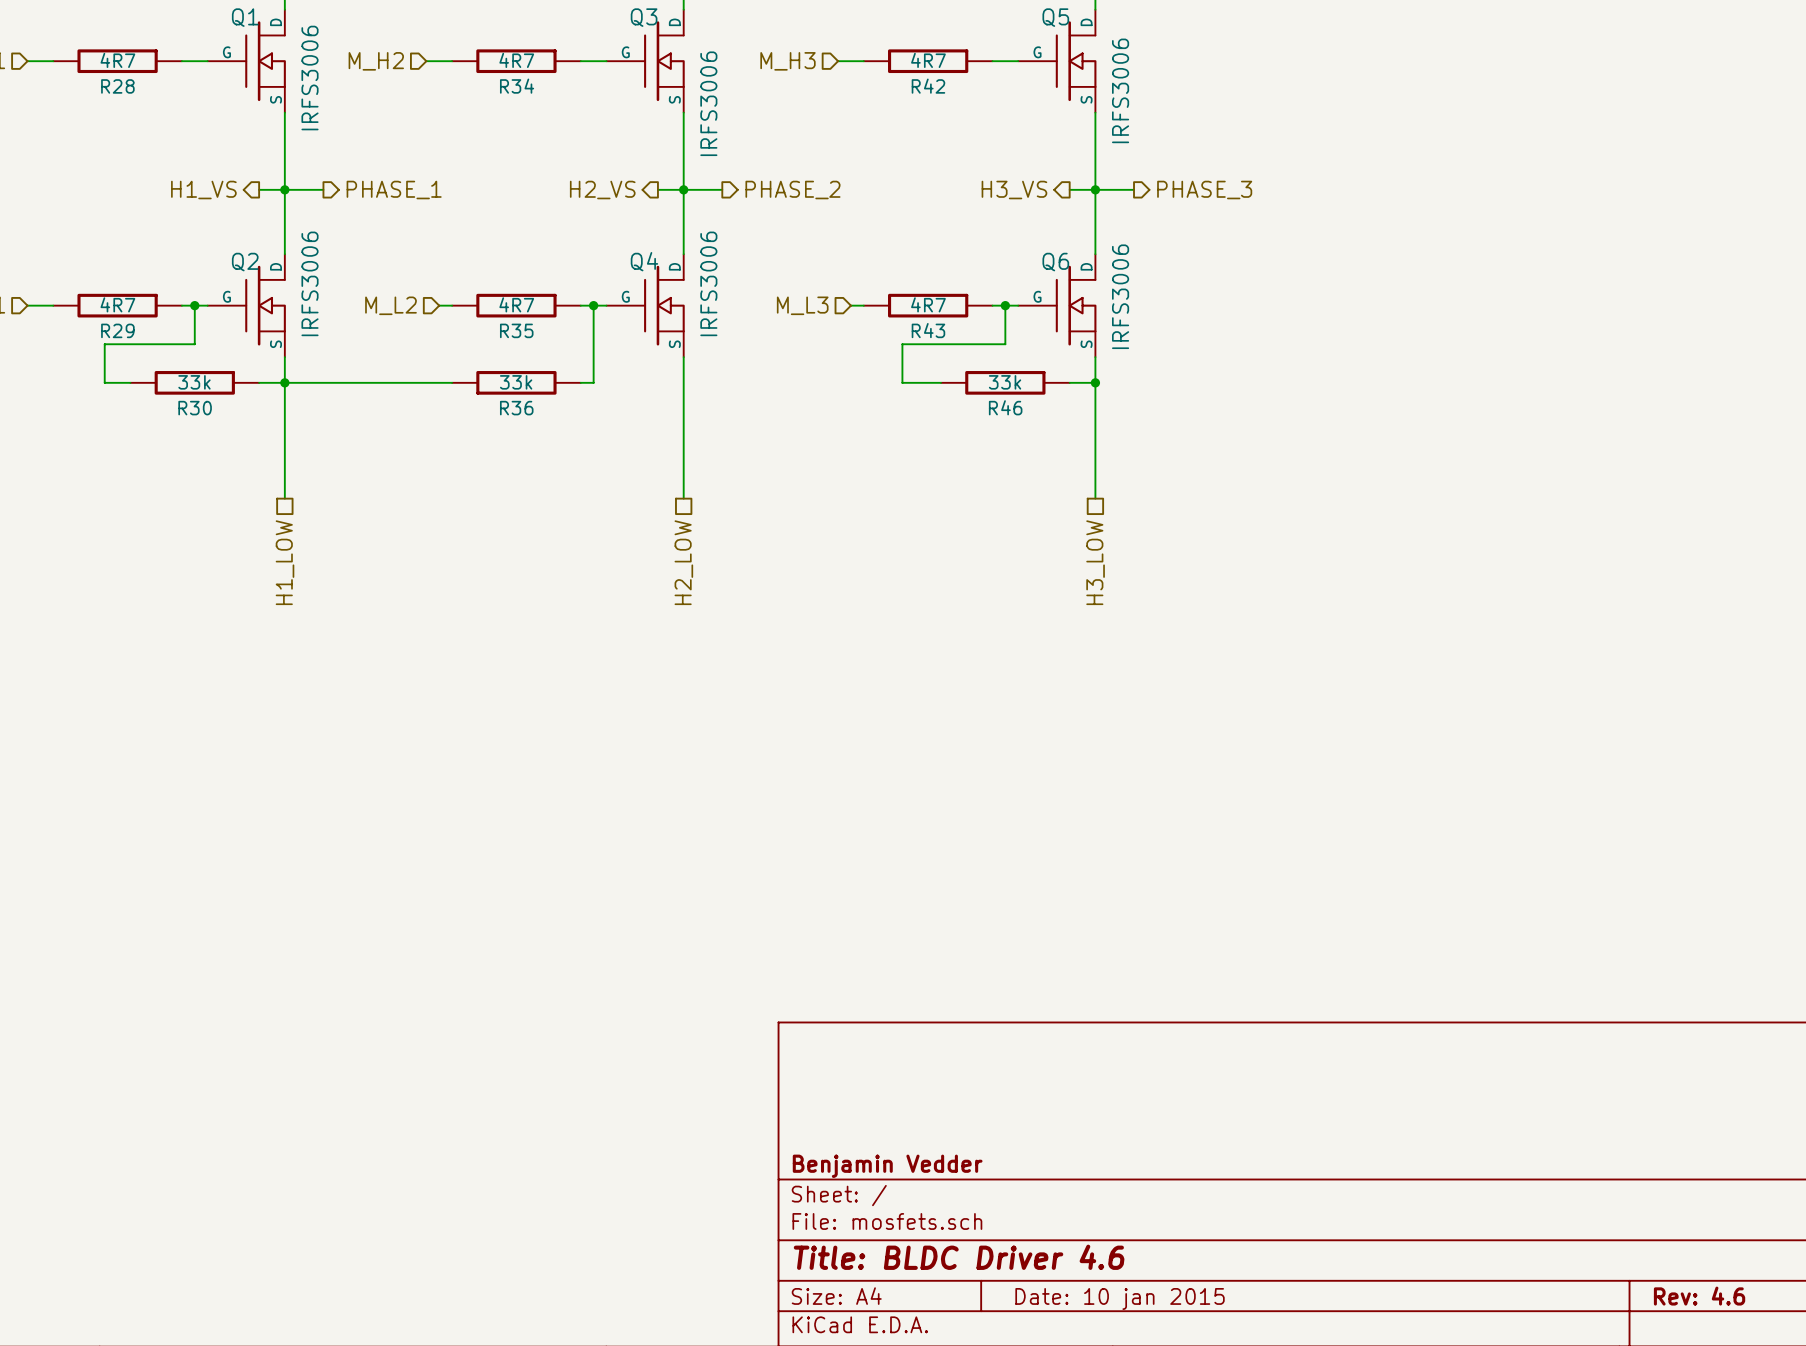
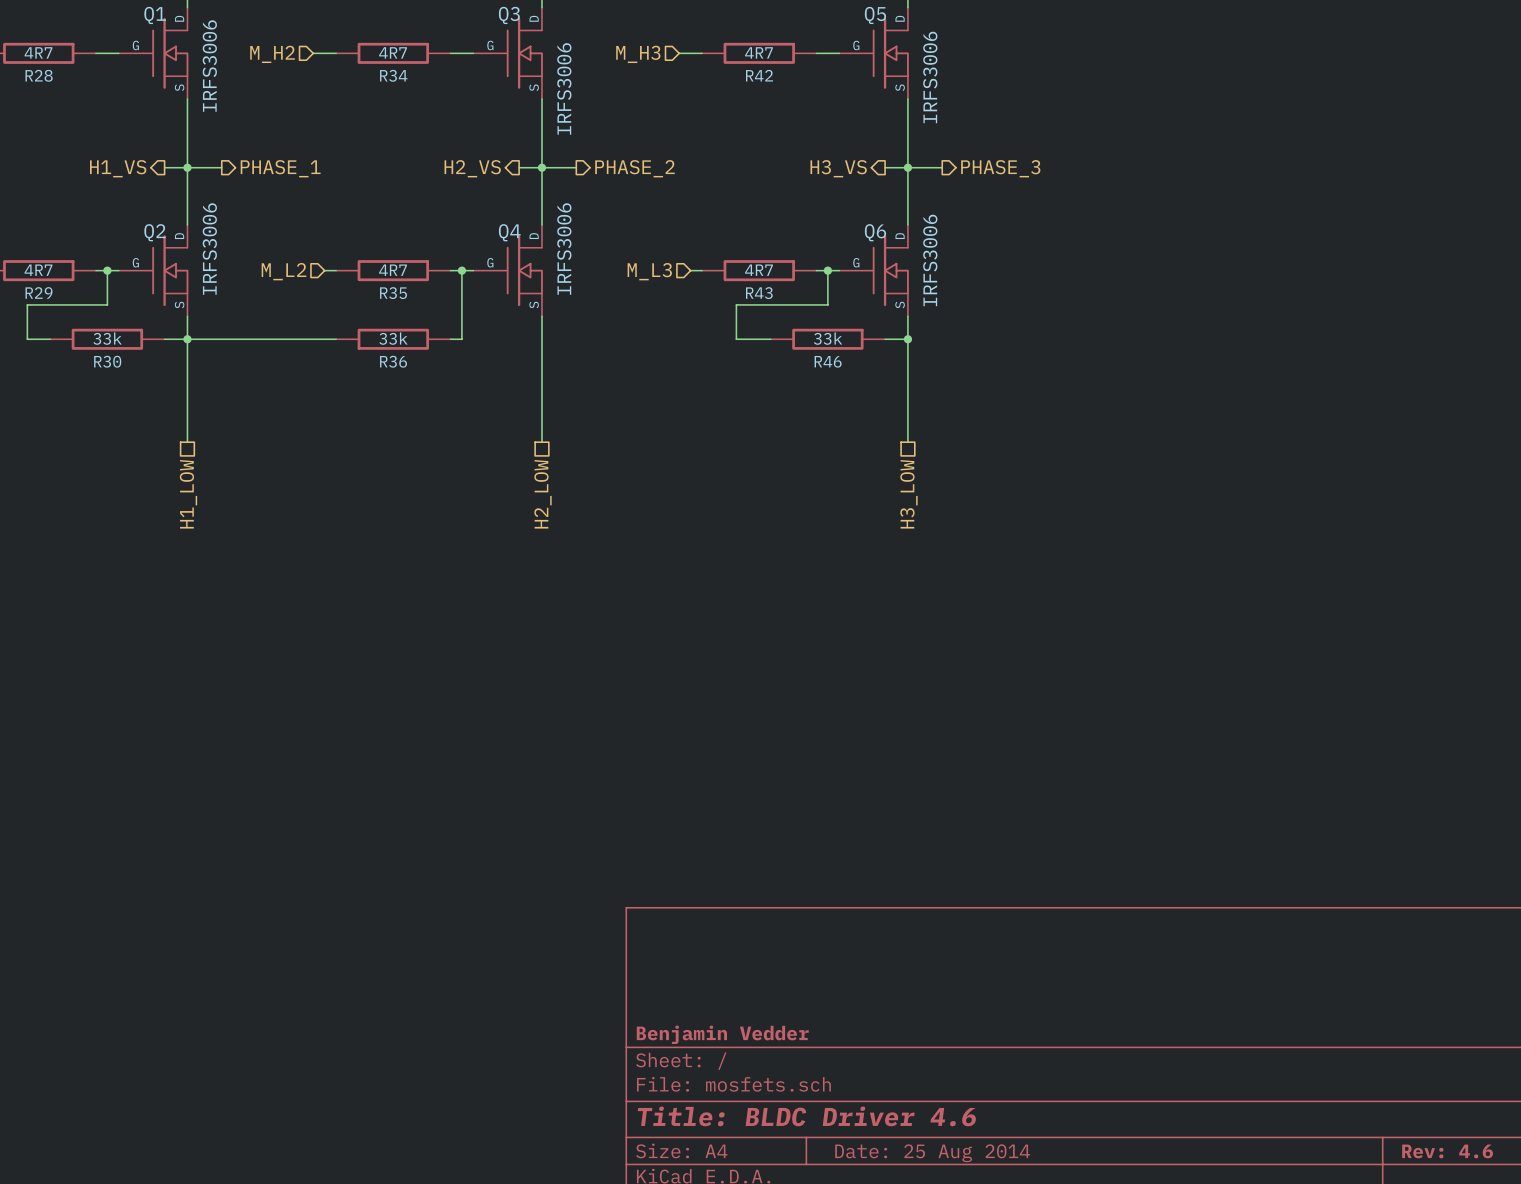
title block: Date: 10 jan 2015 (1120, 1298) -> Date: 25 Aug 2014 (932, 1153)

